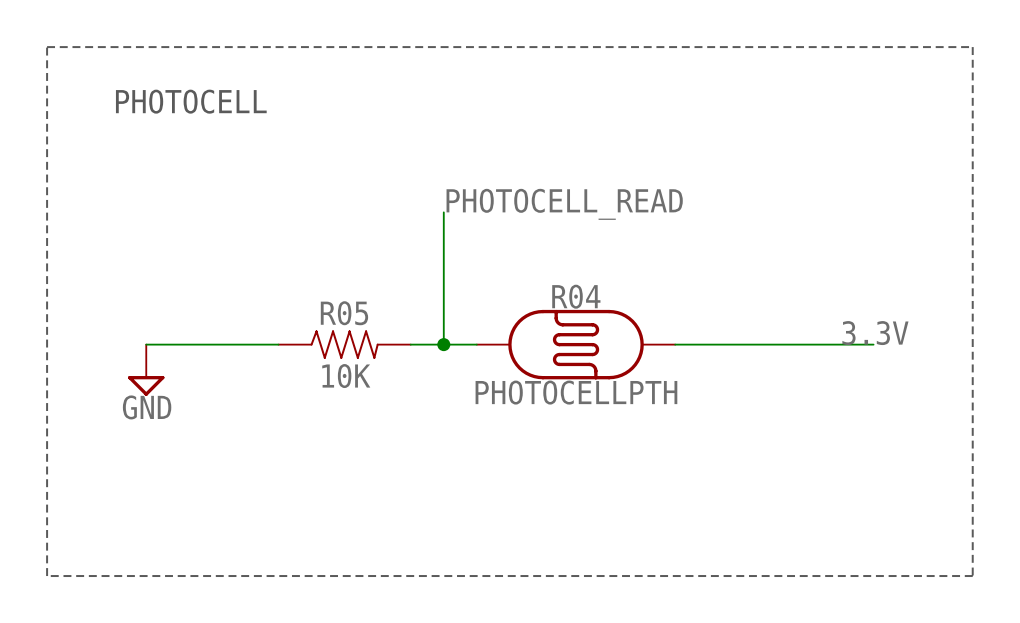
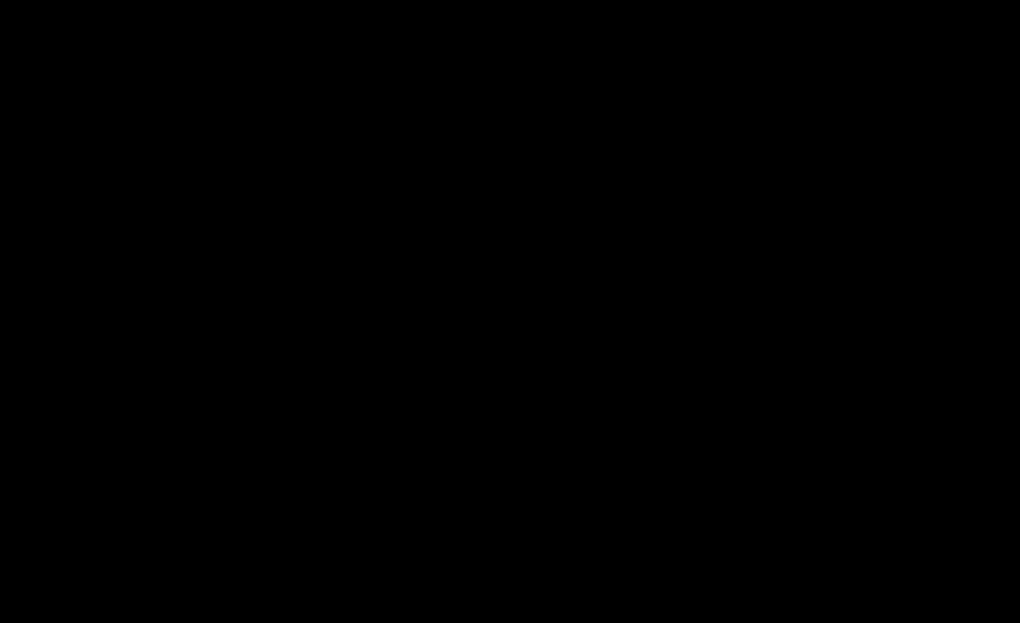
line: (47, 47) (972, 47) (972, 576) (47, 576) (47, 47) -> none
text: PHOTOCELL (191, 101) -> none
label: PHOTOCELL_READ (564, 204) -> none
wire: (443, 212) (443, 344) -> none
label: 3.3V (875, 333) -> none
wire: (146, 344) (278, 344) -> none
R05: 10K (344, 344) -> none
wire: (410, 344) (476, 344) -> none
junction: (443, 344) -> none
R04: PHOTOCELLPTH (576, 344) -> none
wire: (675, 344) (873, 344) -> none
power symbol: GND (146, 370) -> none

